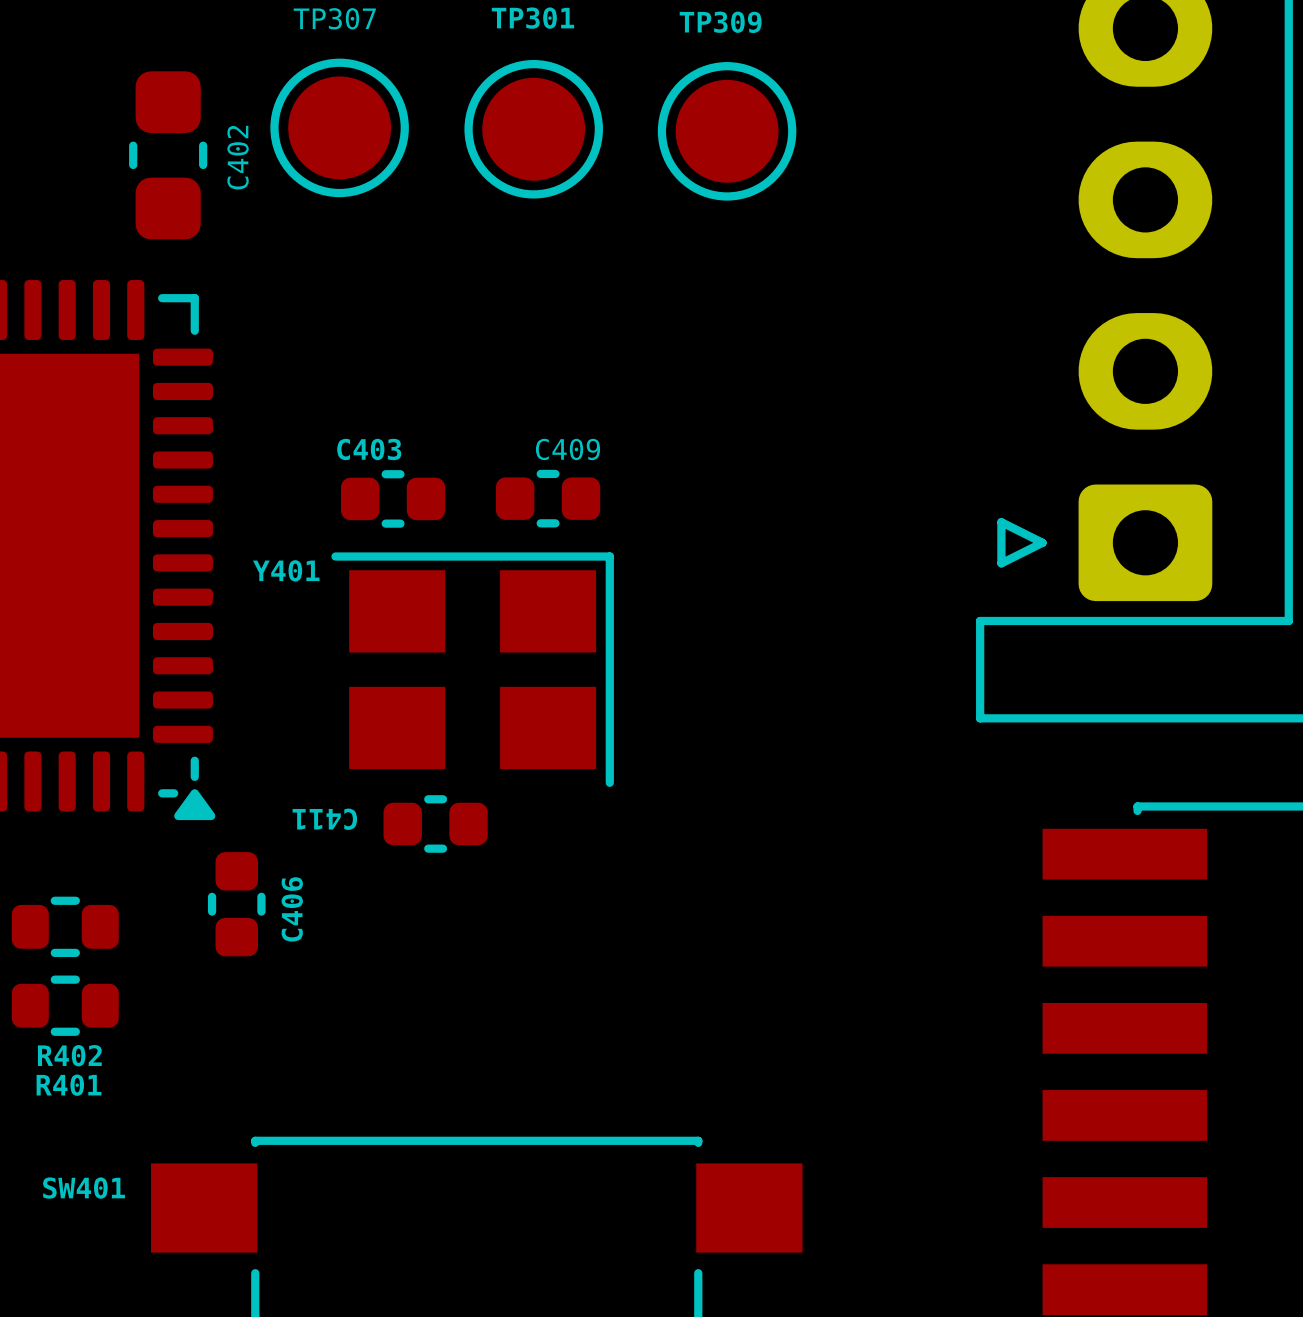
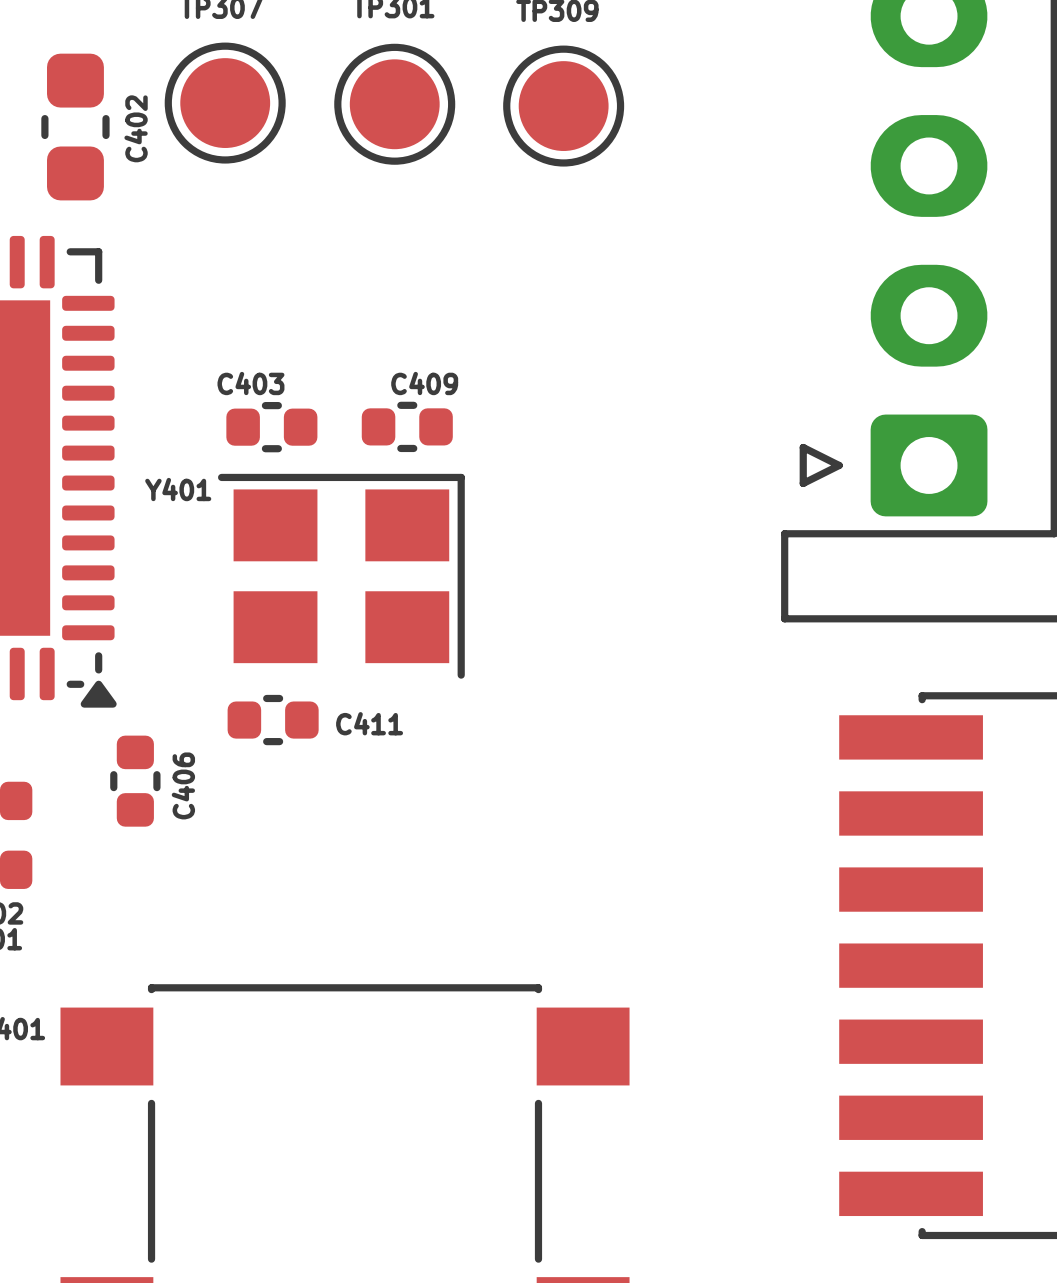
C411 name rotation: 0° (324, 819) -> 180° (369, 723)
C411 name position: C411 (324, 819) -> C411 (369, 723)
C411 position: (435, 823) -> (273, 720)

